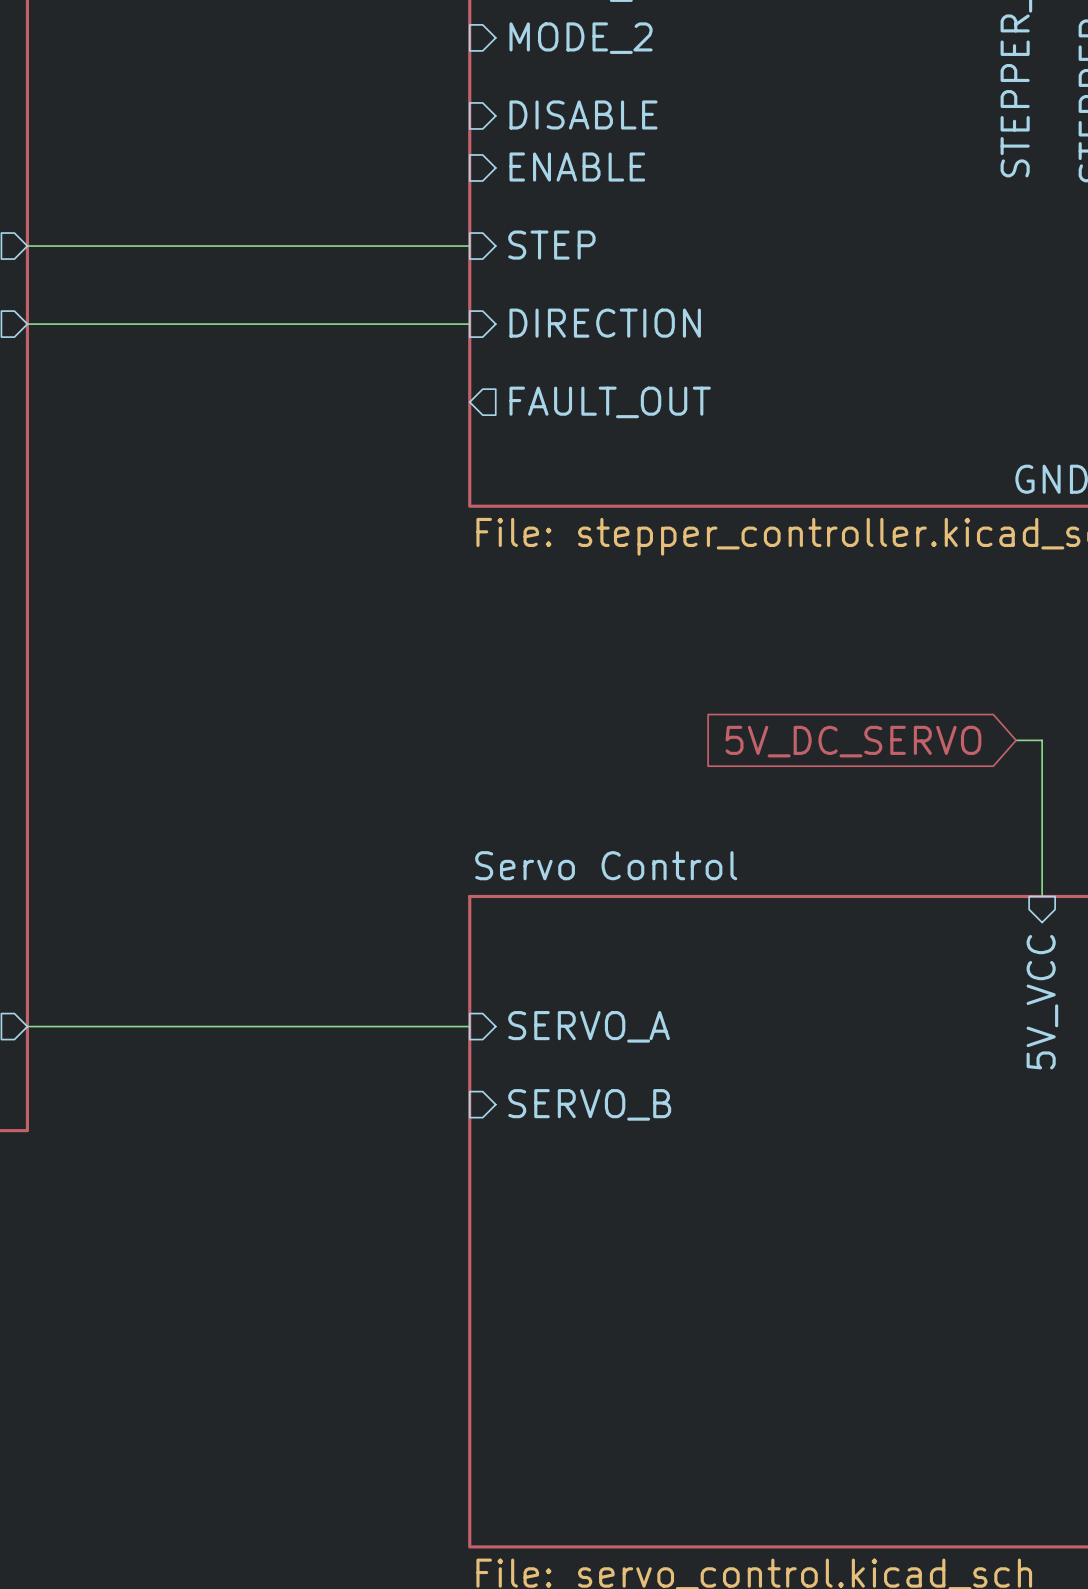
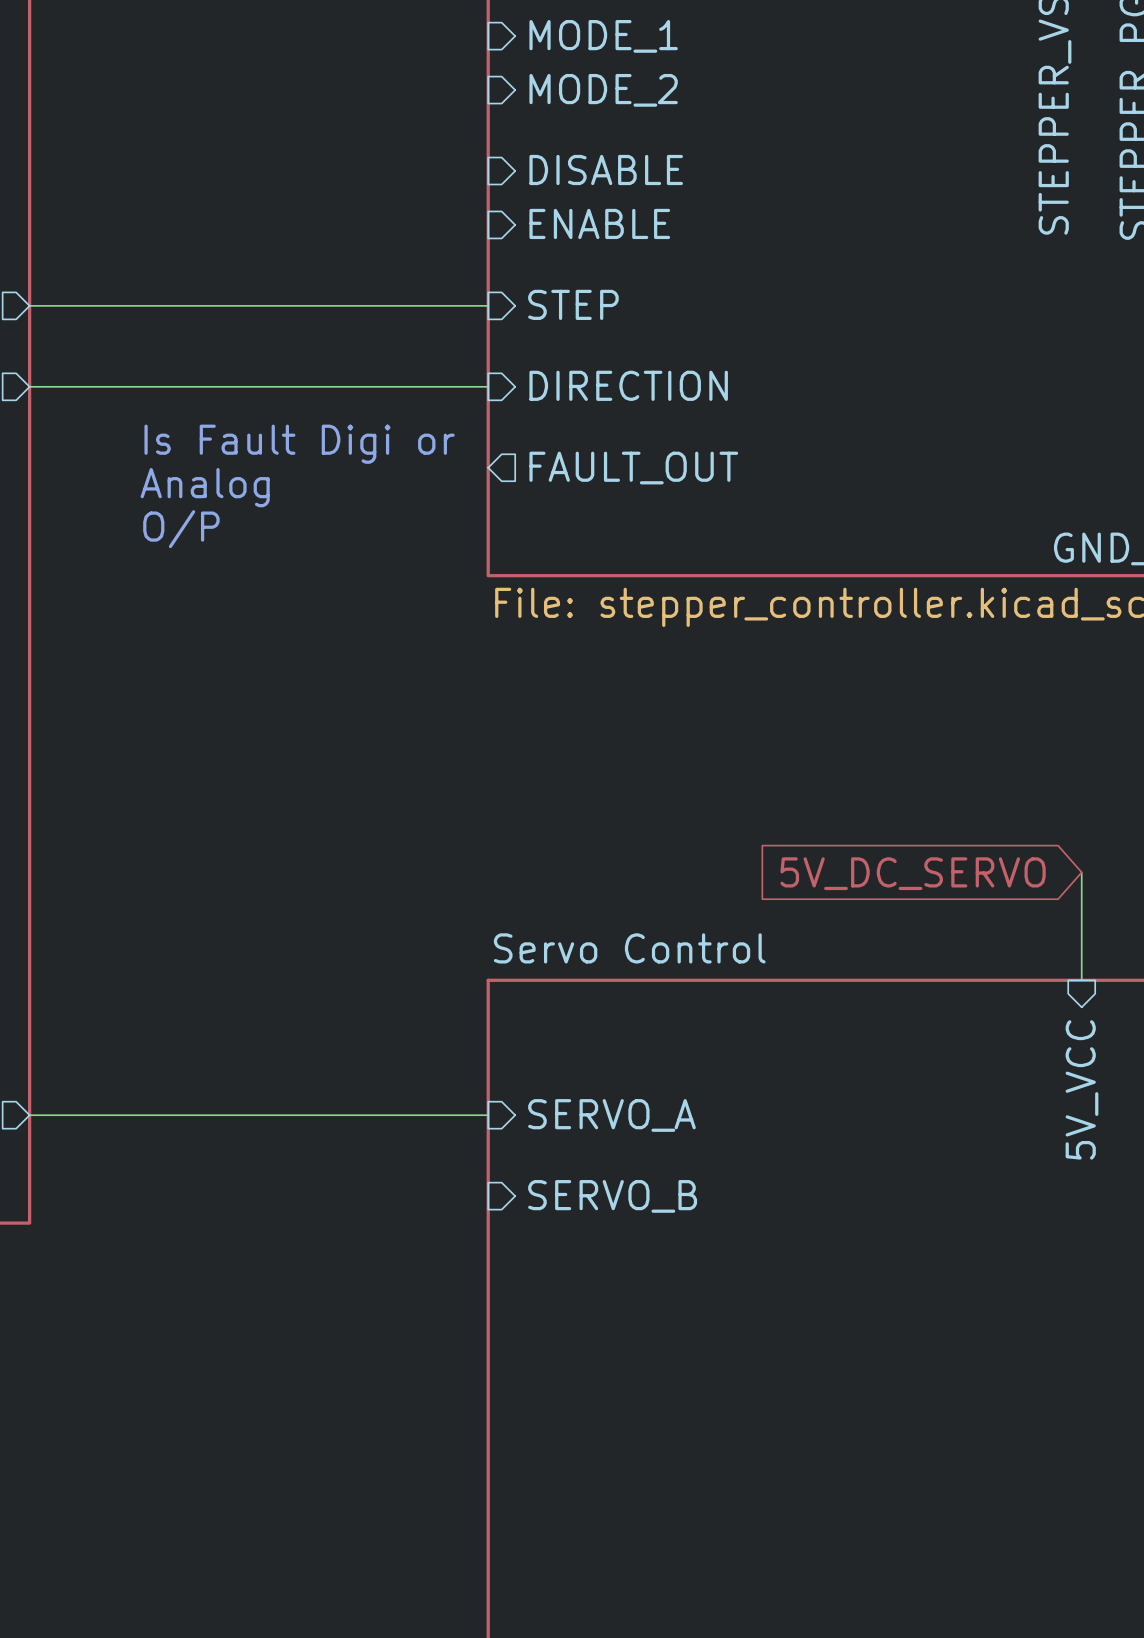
text: none -> Is Fault Digi or (299, 444)
text: none -> Analog (205, 487)
text: none -> O/P (181, 529)
wire: (1016, 740) (1042, 740) (1042, 792) -> none
global label position: 5V_DC_SERVO (853, 741) -> 5V_DC_SERVO (913, 873)

